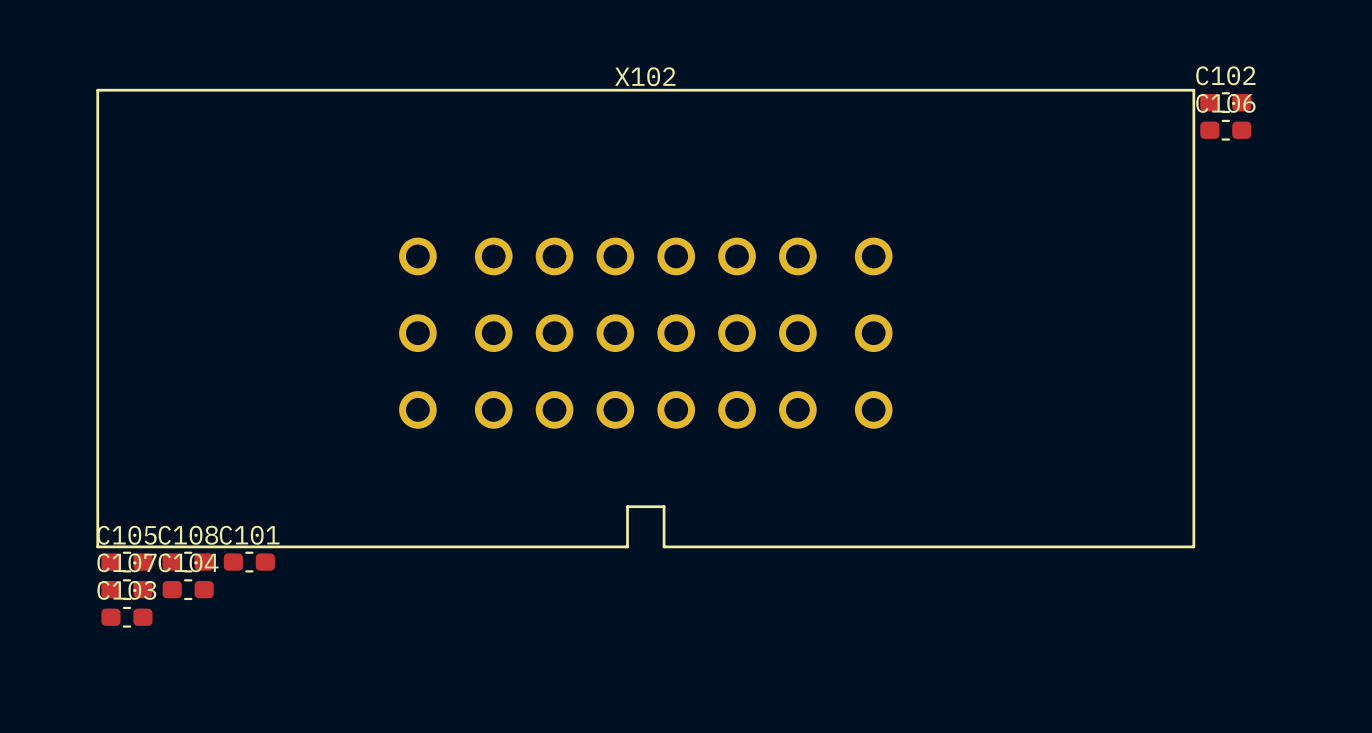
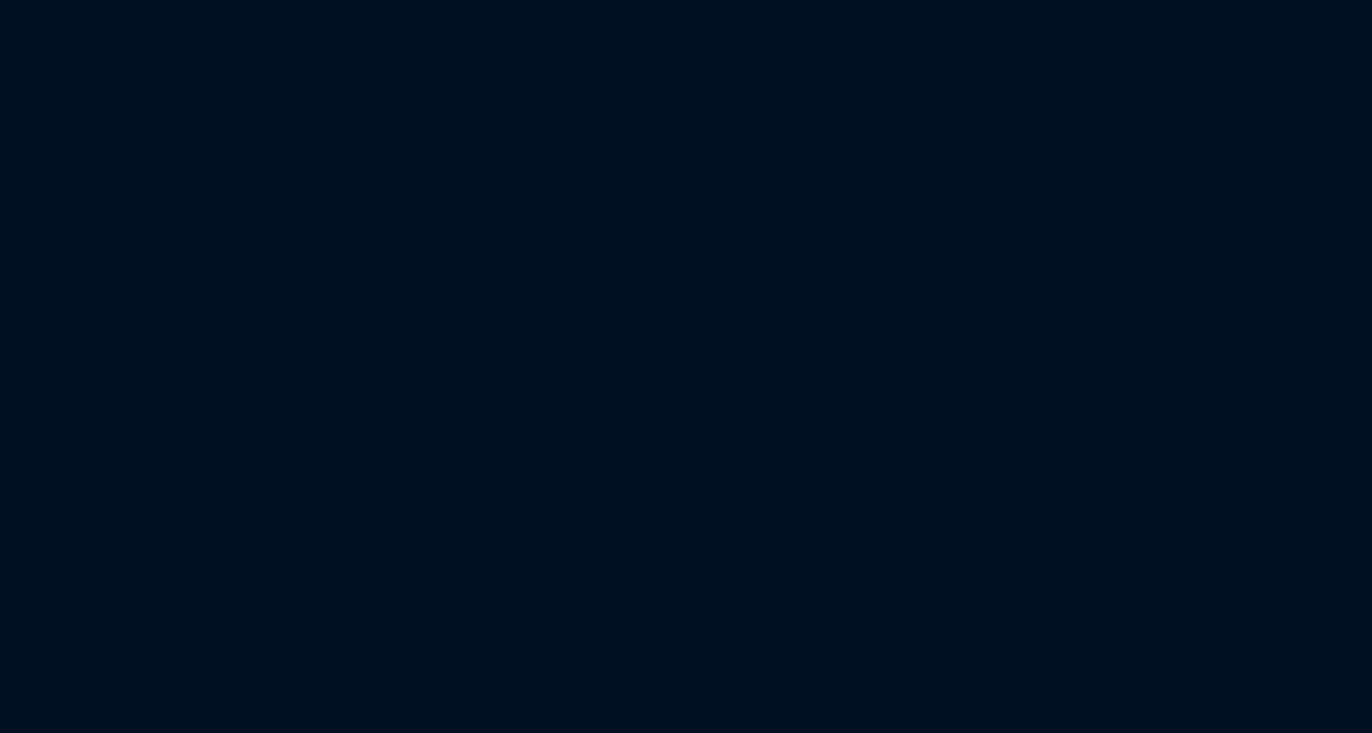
C102: (1225, 102) -> none
C106: (1225, 130) -> none
X102: (645, 318) -> none
C105: (126, 562) -> none
C108: (188, 562) -> none
C101: (249, 562) -> none
C107: (126, 589) -> none
C104: (188, 589) -> none
C103: (126, 617) -> none

